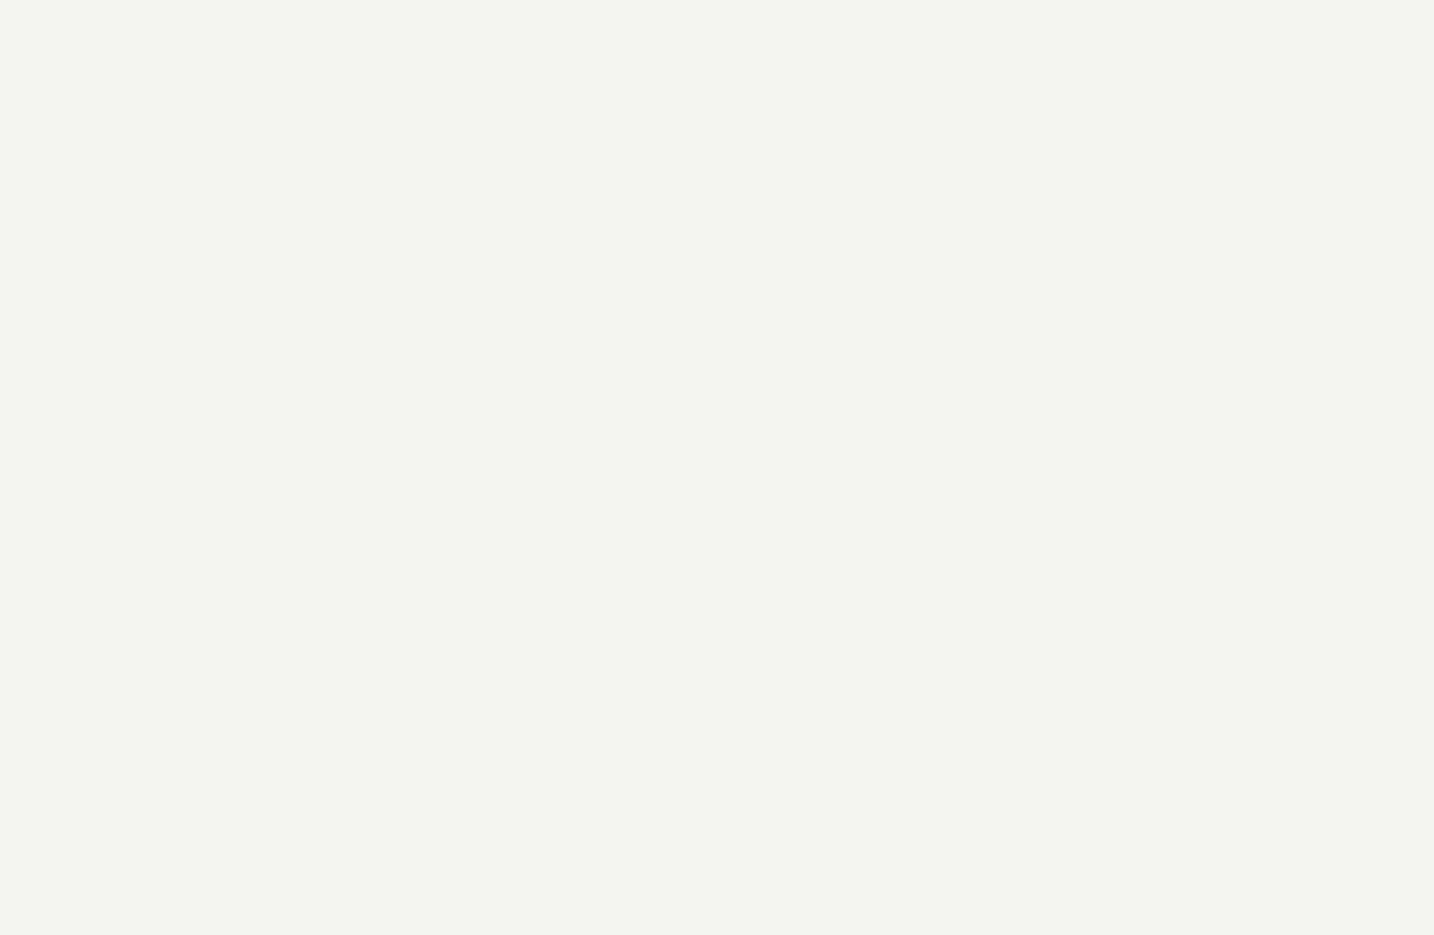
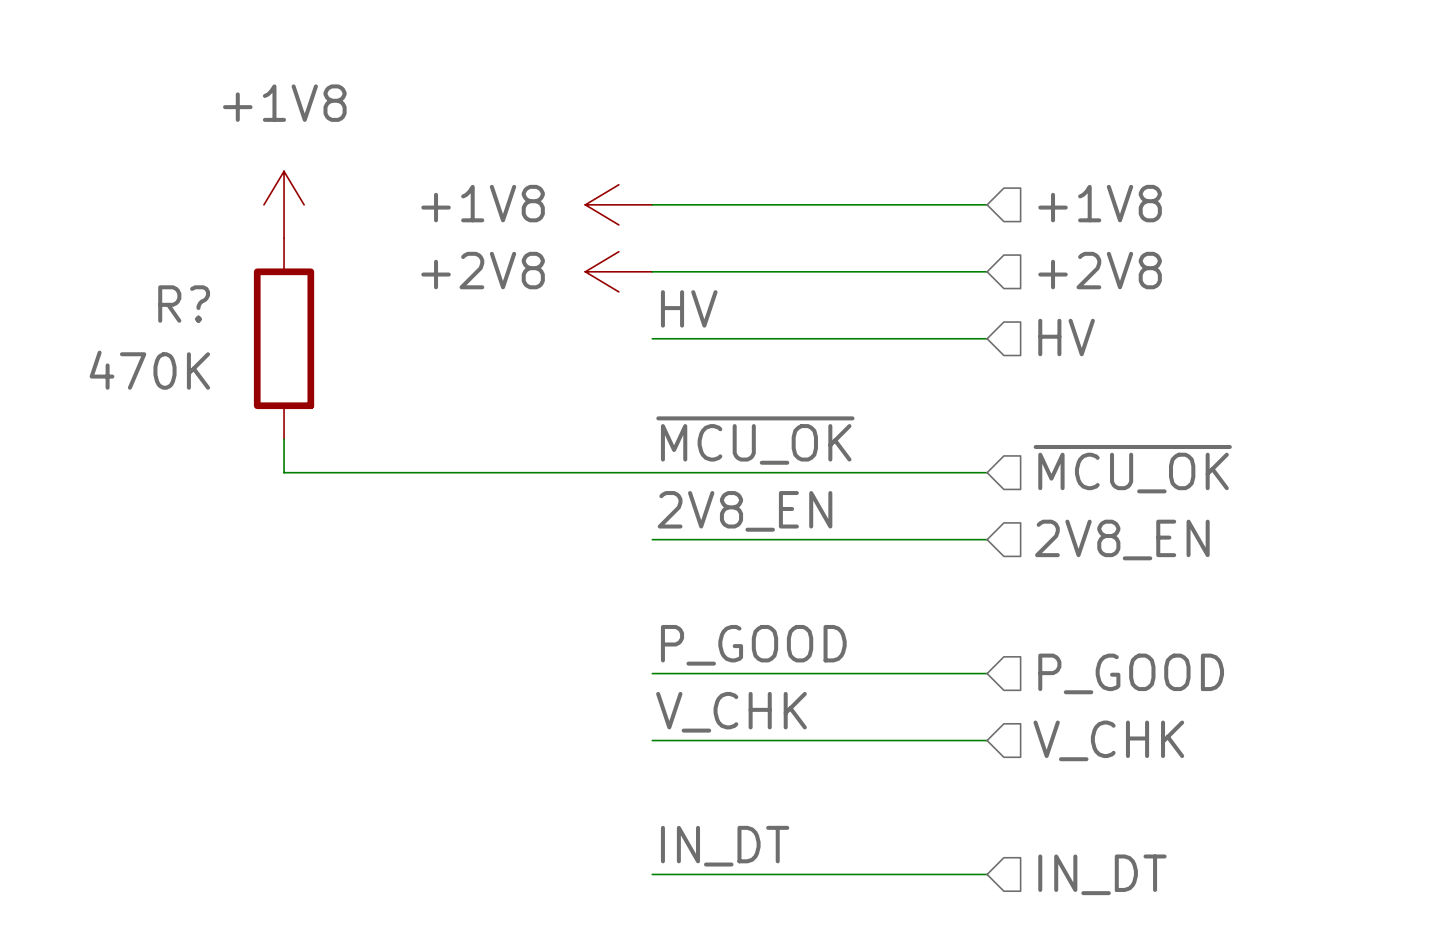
hierarchical label: none -> +1V8 (1100, 203)
power symbol: none -> +1V8 (284, 204)
power symbol: none -> +1V8 (618, 204)
wire: none -> (652, 204) (987, 204)
hierarchical label: none -> +2V8 (1100, 270)
power symbol: none -> +2V8 (618, 271)
wire: none -> (652, 271) (987, 271)
label: none -> HV (689, 308)
hierarchical label: none -> HV (1066, 337)
R?: none -> 470K (284, 338)
wire: none -> (652, 338) (987, 338)
wire: none -> (284, 439) (284, 472) (987, 472)
label: none -> ~{MCU_OK} (755, 440)
hierarchical label: none -> ~{MCU_OK} (1132, 469)
label: none -> 2V8_EN (745, 511)
wire: none -> (652, 539) (987, 539)
hierarchical label: none -> 2V8_EN (1122, 540)
label: none -> P_GOOD (753, 645)
wire: none -> (652, 673) (987, 673)
hierarchical label: none -> P_GOOD (1131, 673)
label: none -> V_CHK (731, 712)
wire: none -> (652, 740) (987, 740)
hierarchical label: none -> V_CHK (1108, 740)
label: none -> IN_DT (725, 846)
wire: none -> (652, 874) (987, 874)
hierarchical label: none -> IN_DT (1102, 874)

